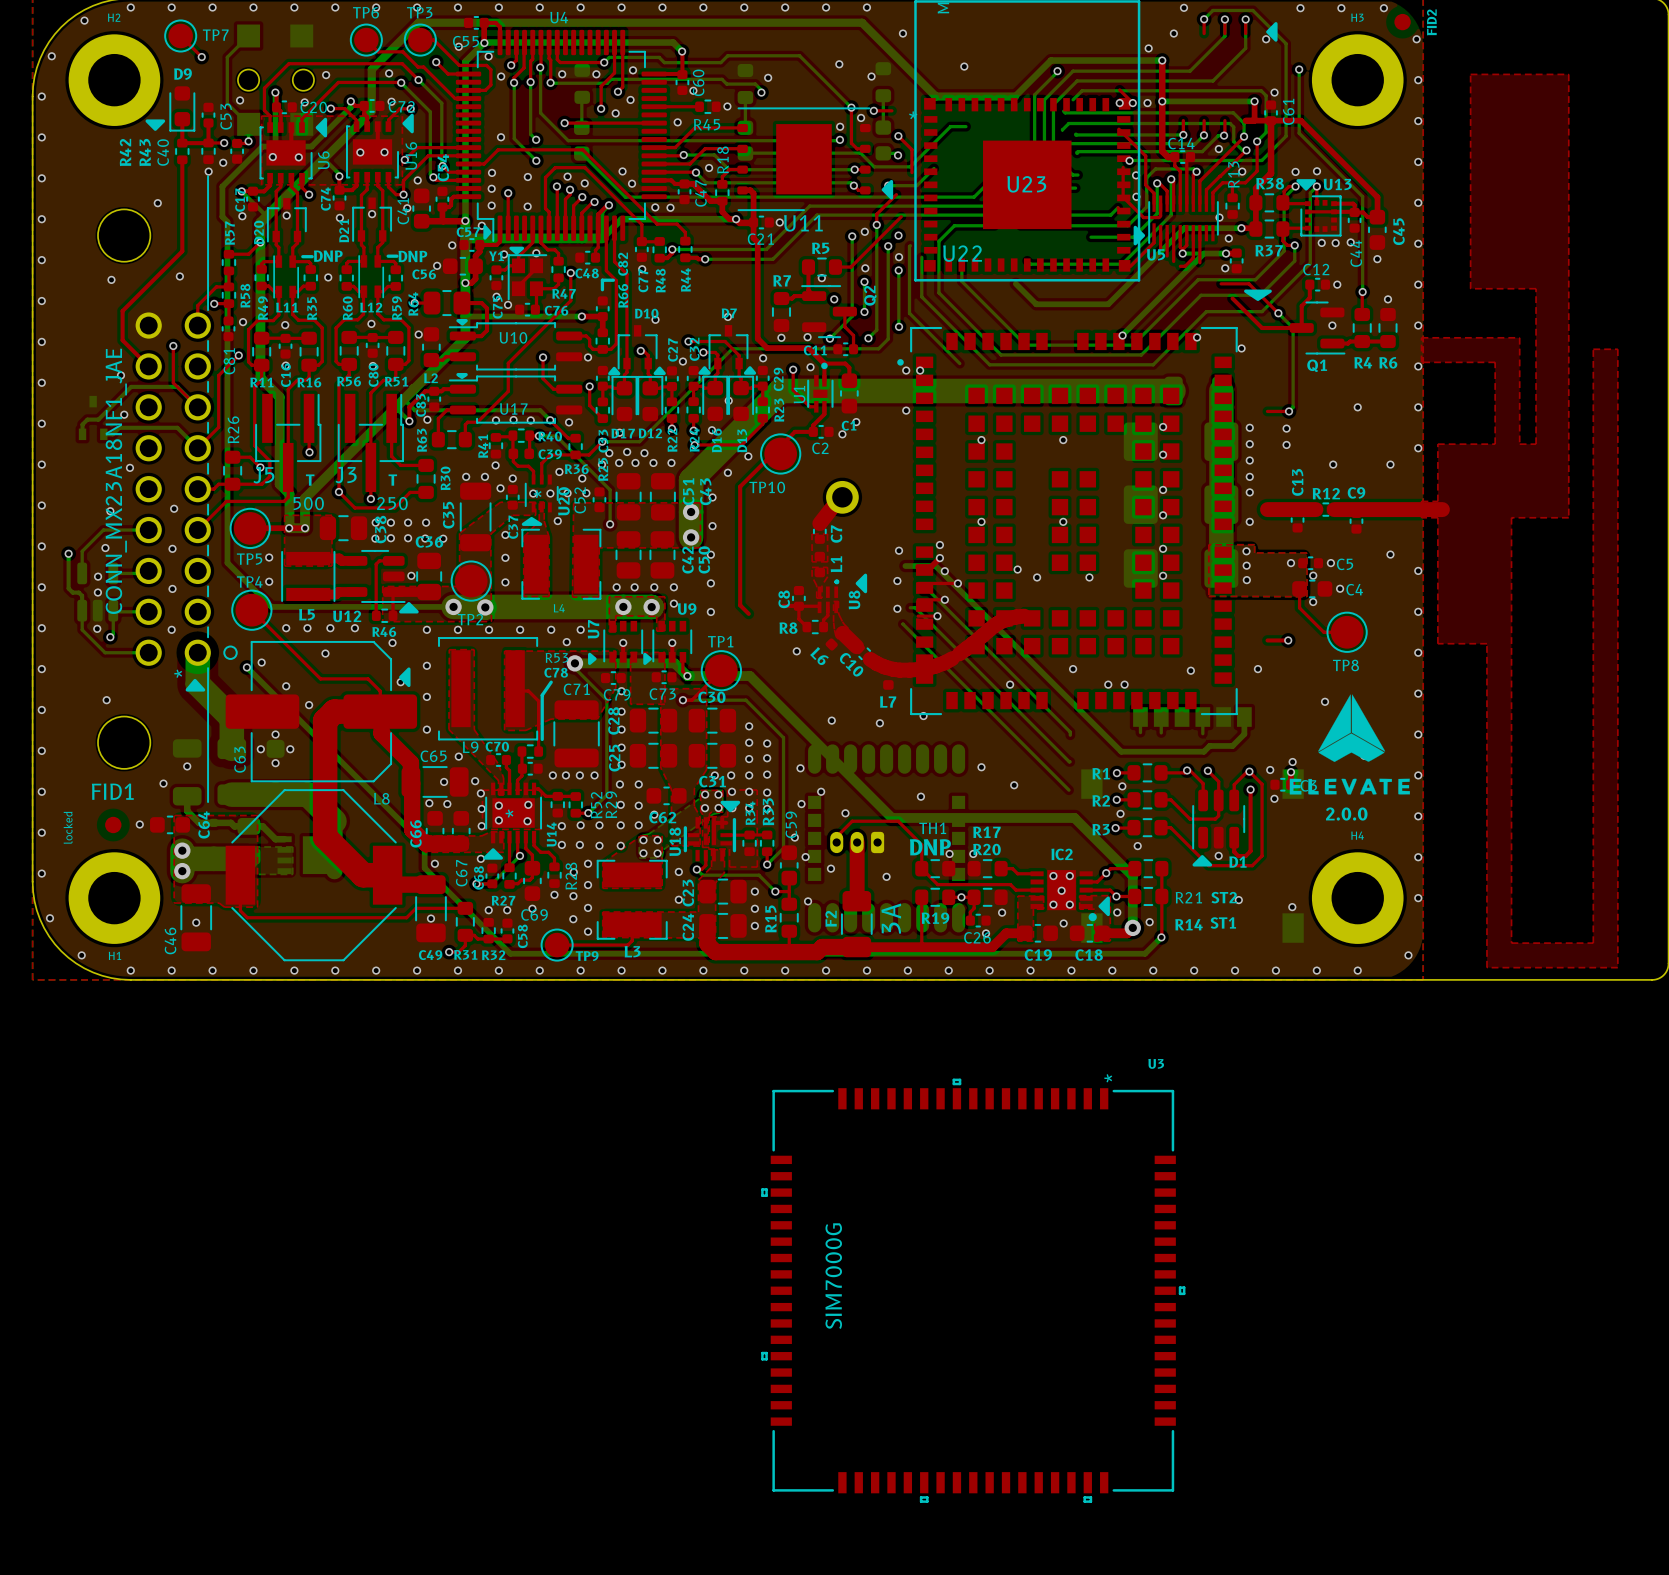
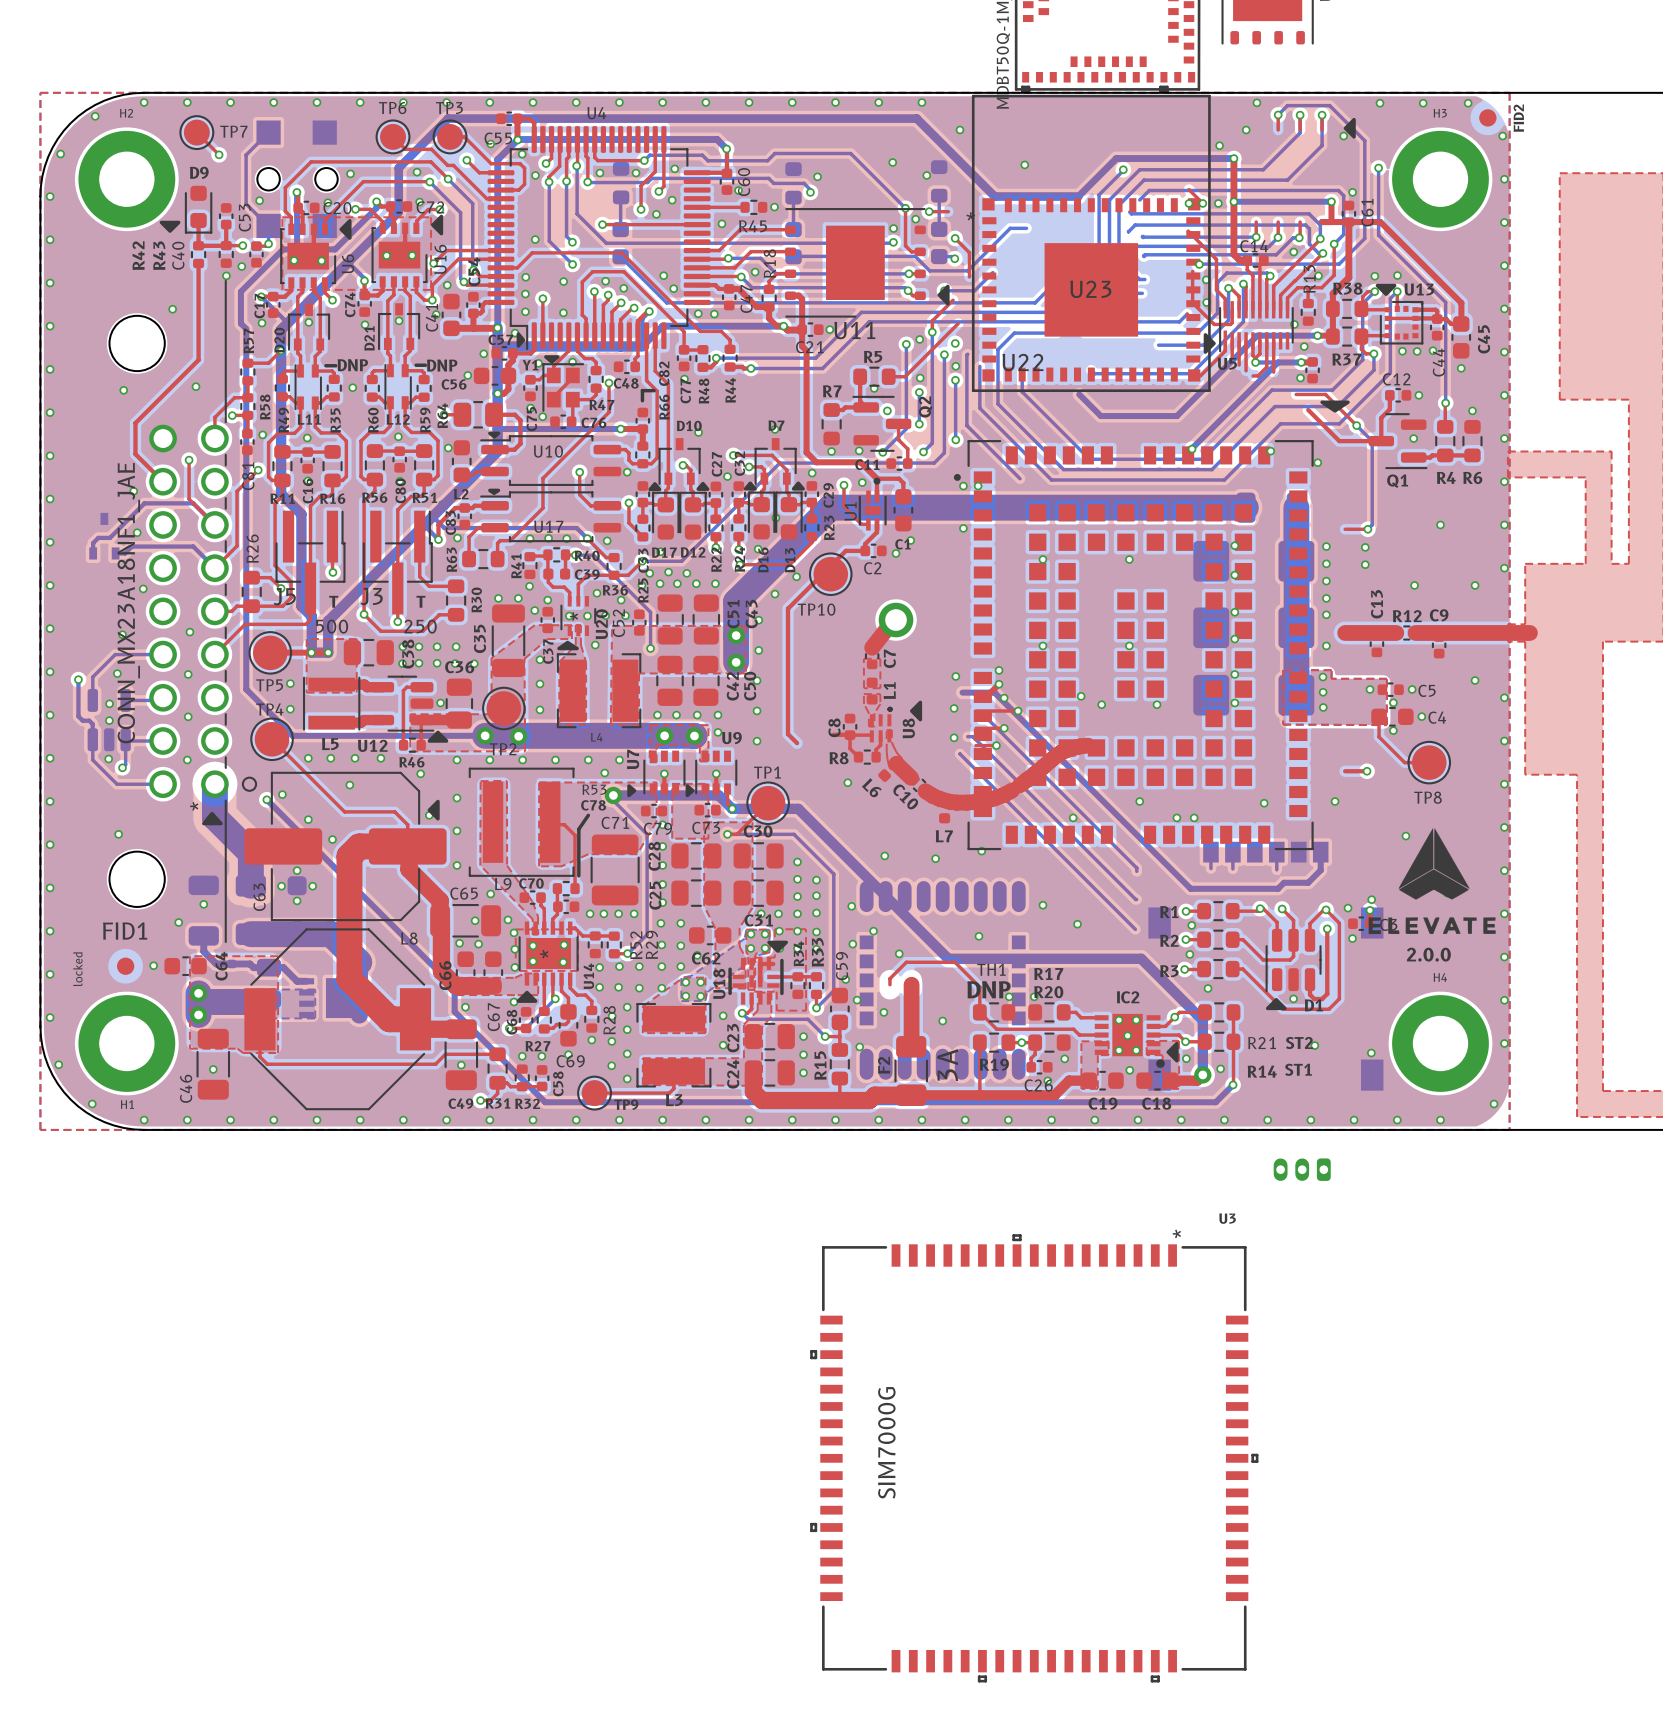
part: (857, 842) -> none
part: none -> (1302, 1169)

